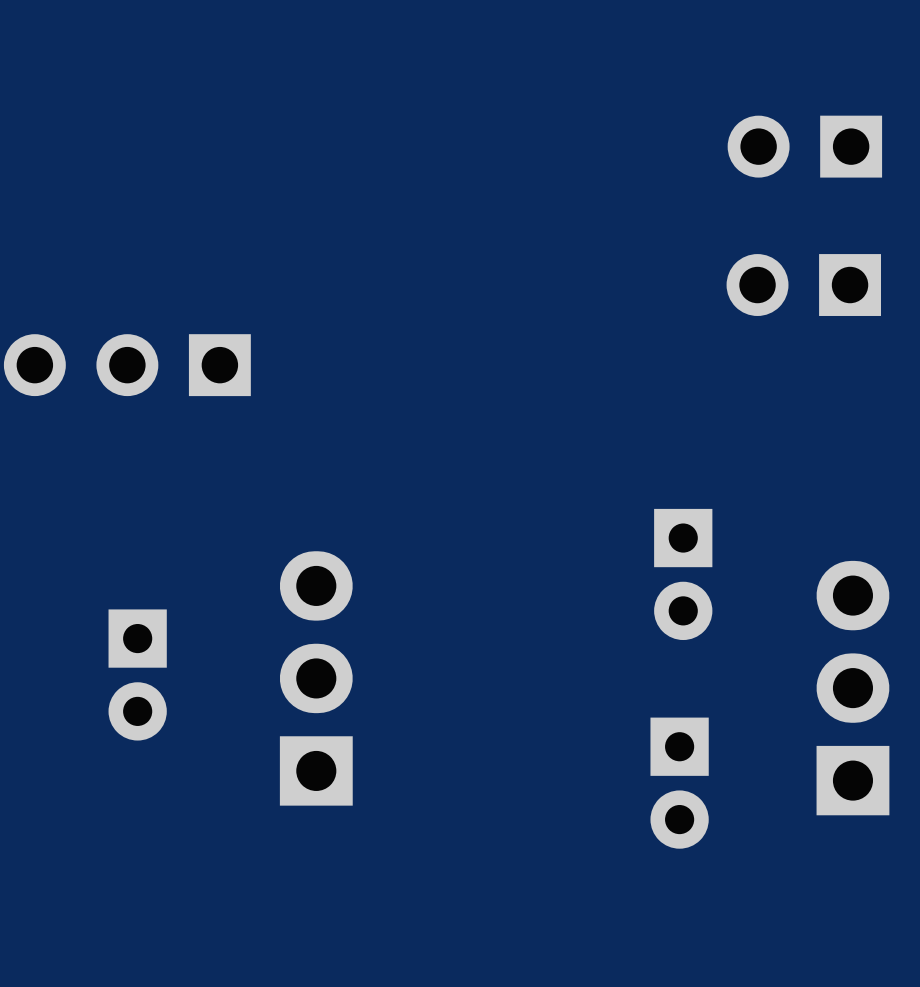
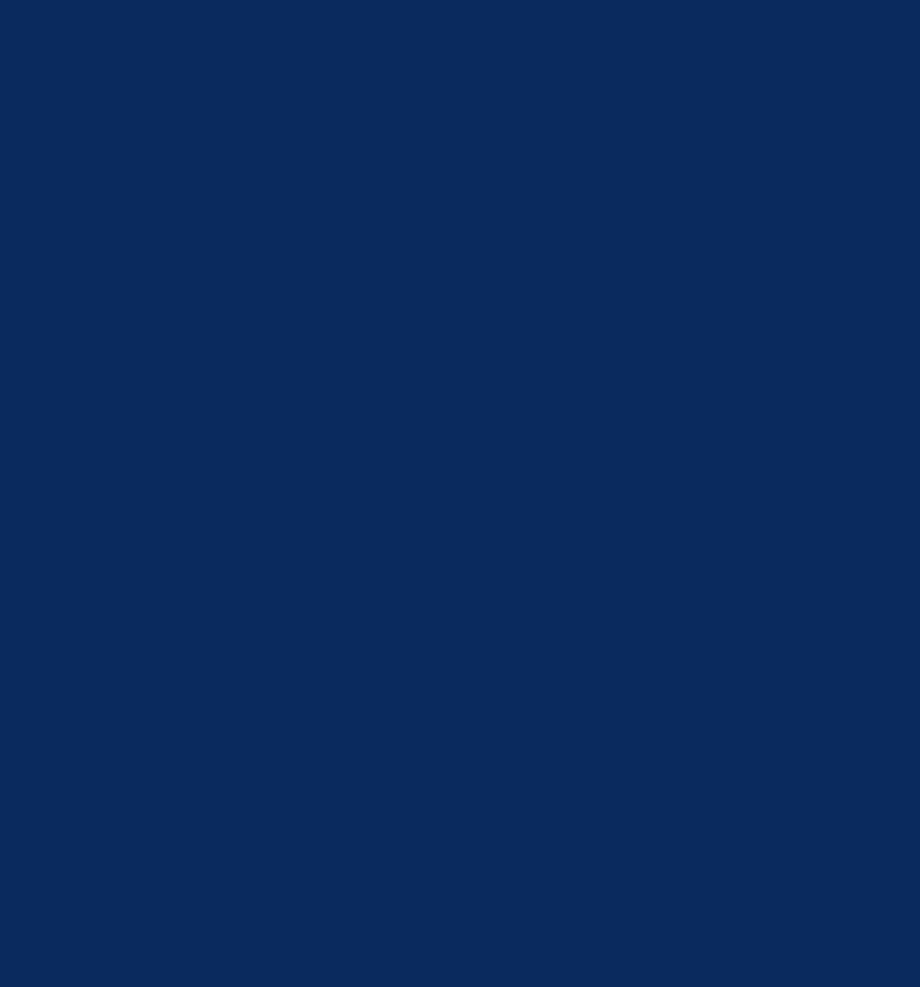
part: (804, 146) -> none
part: (803, 285) -> none
part: (127, 365) -> none
part: (683, 574) -> none
part: (137, 674) -> none
part: (316, 678) -> none
part: (852, 688) -> none
part: (679, 783) -> none

